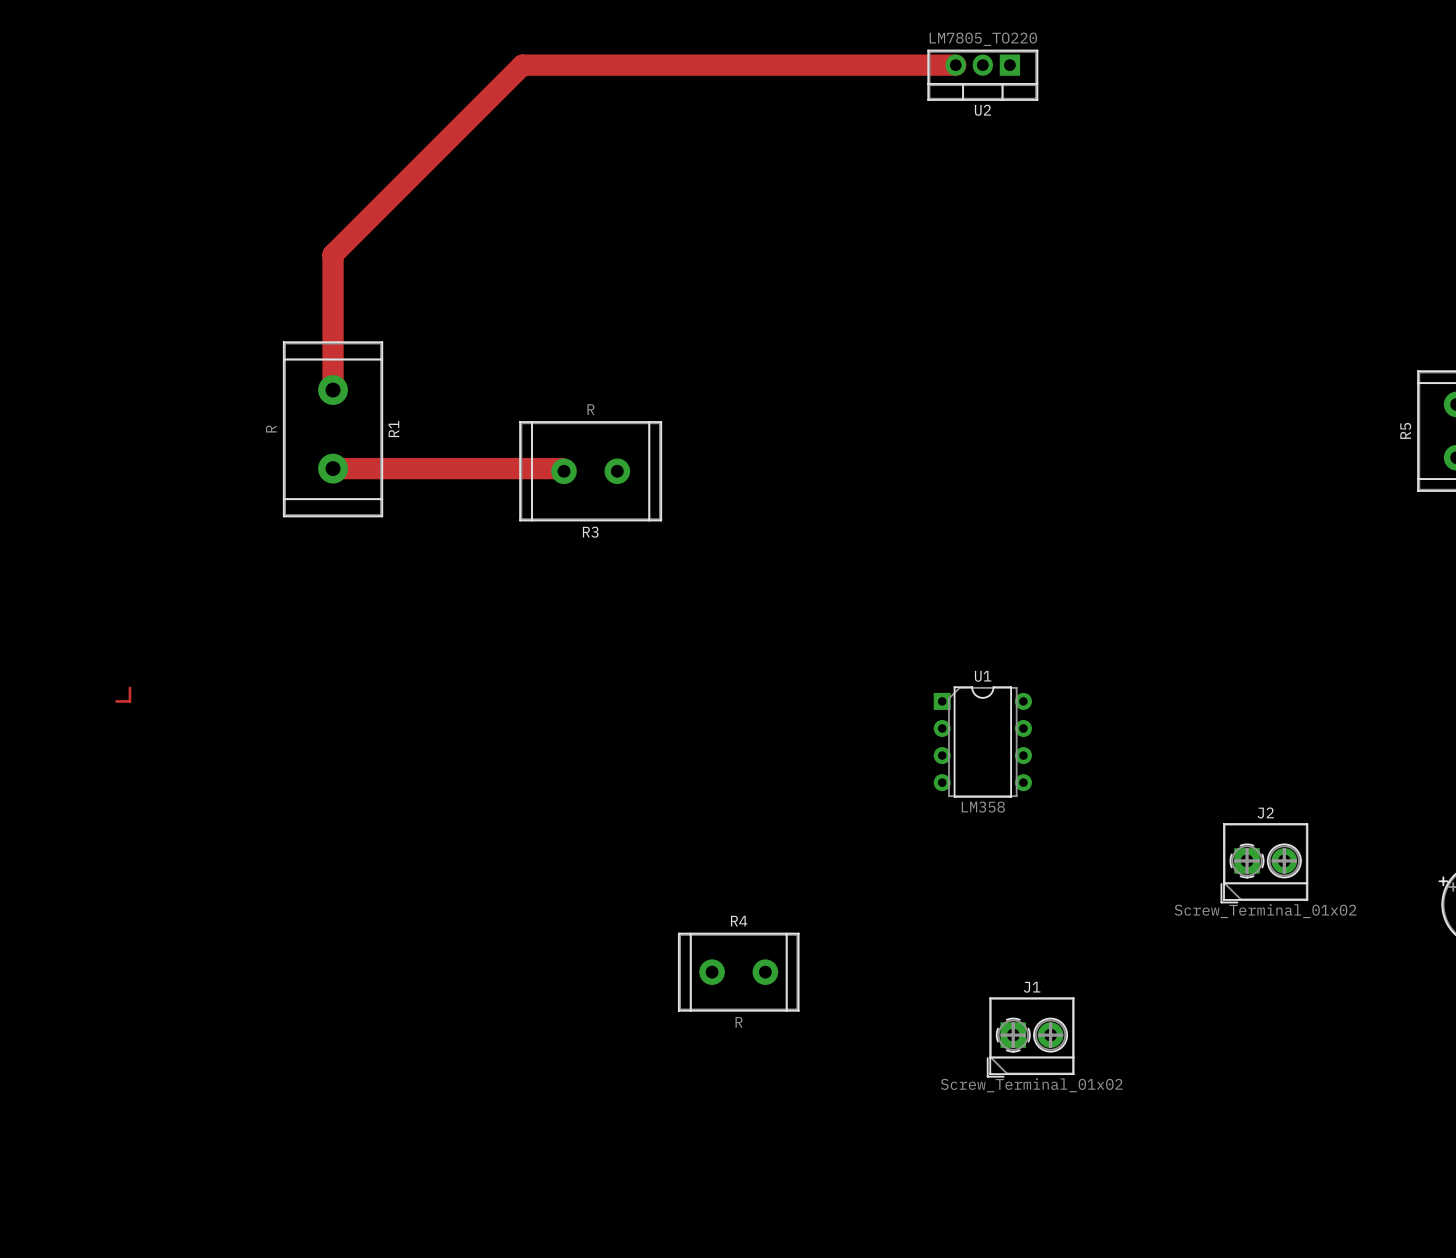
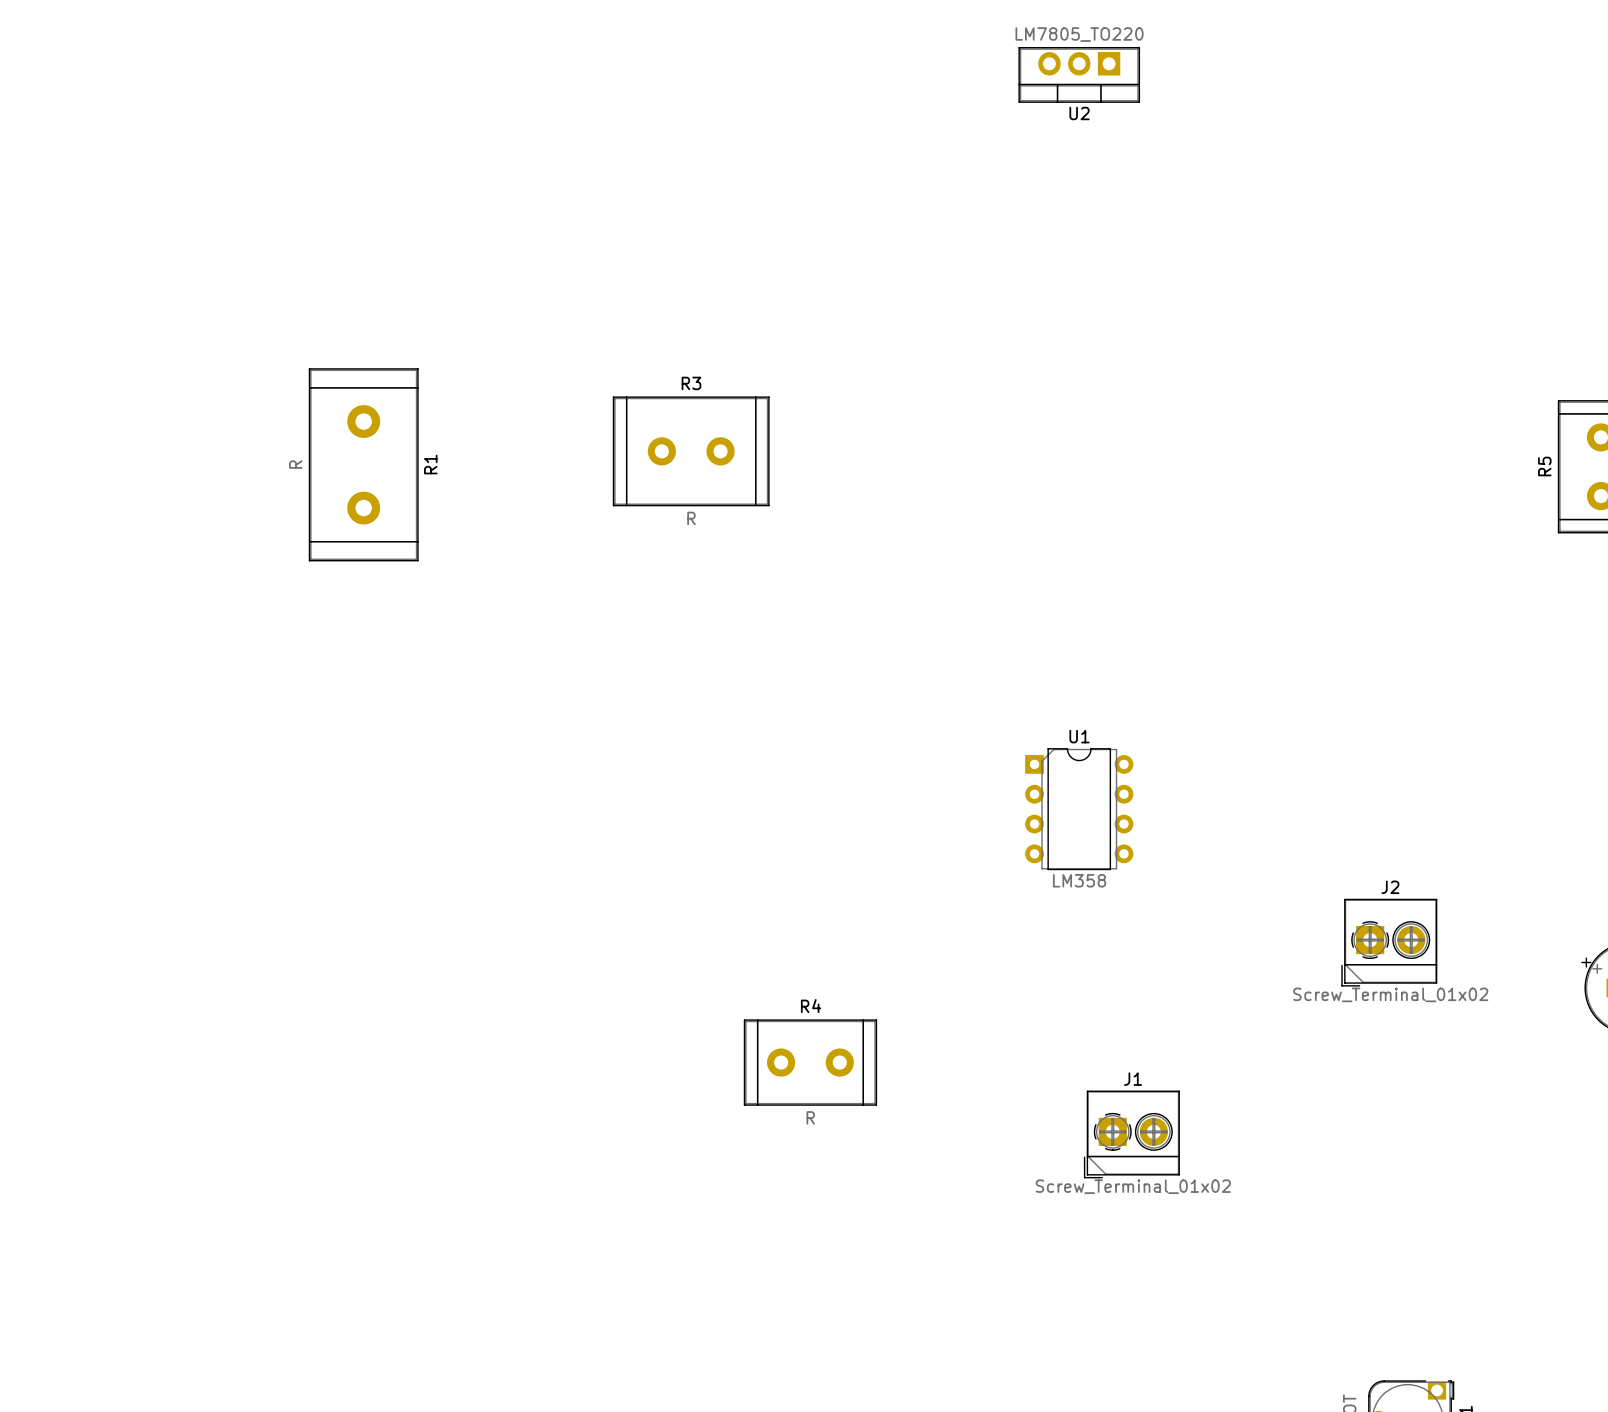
track: (955, 65) (522, 65) (333, 254) (333, 390) -> none
R3 value position: R (590, 409) -> R (691, 518)
track: (333, 468) (561, 468) (564, 471) -> none
R3 position: (590, 471) -> (691, 451)
R3 name position: R3 (590, 532) -> R3 (691, 383)
track: (129, 687) (129, 701) (116, 701) -> none

